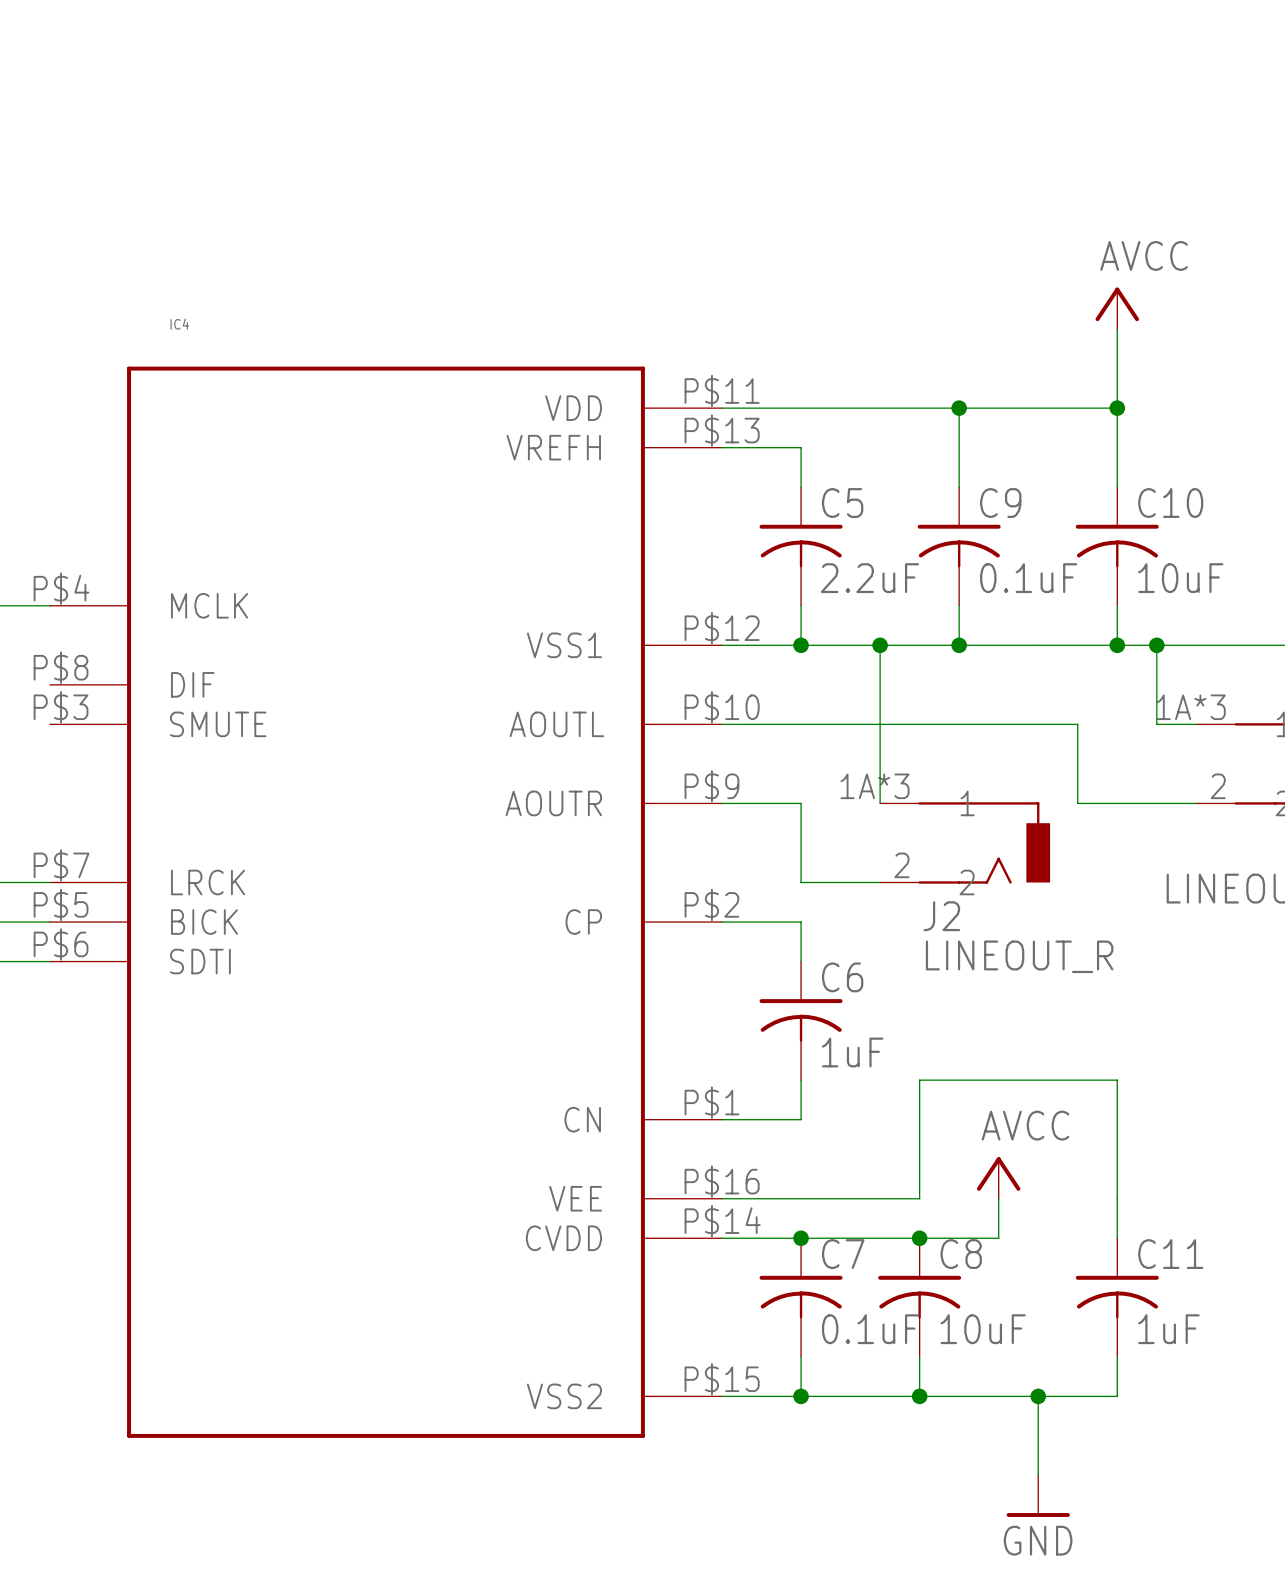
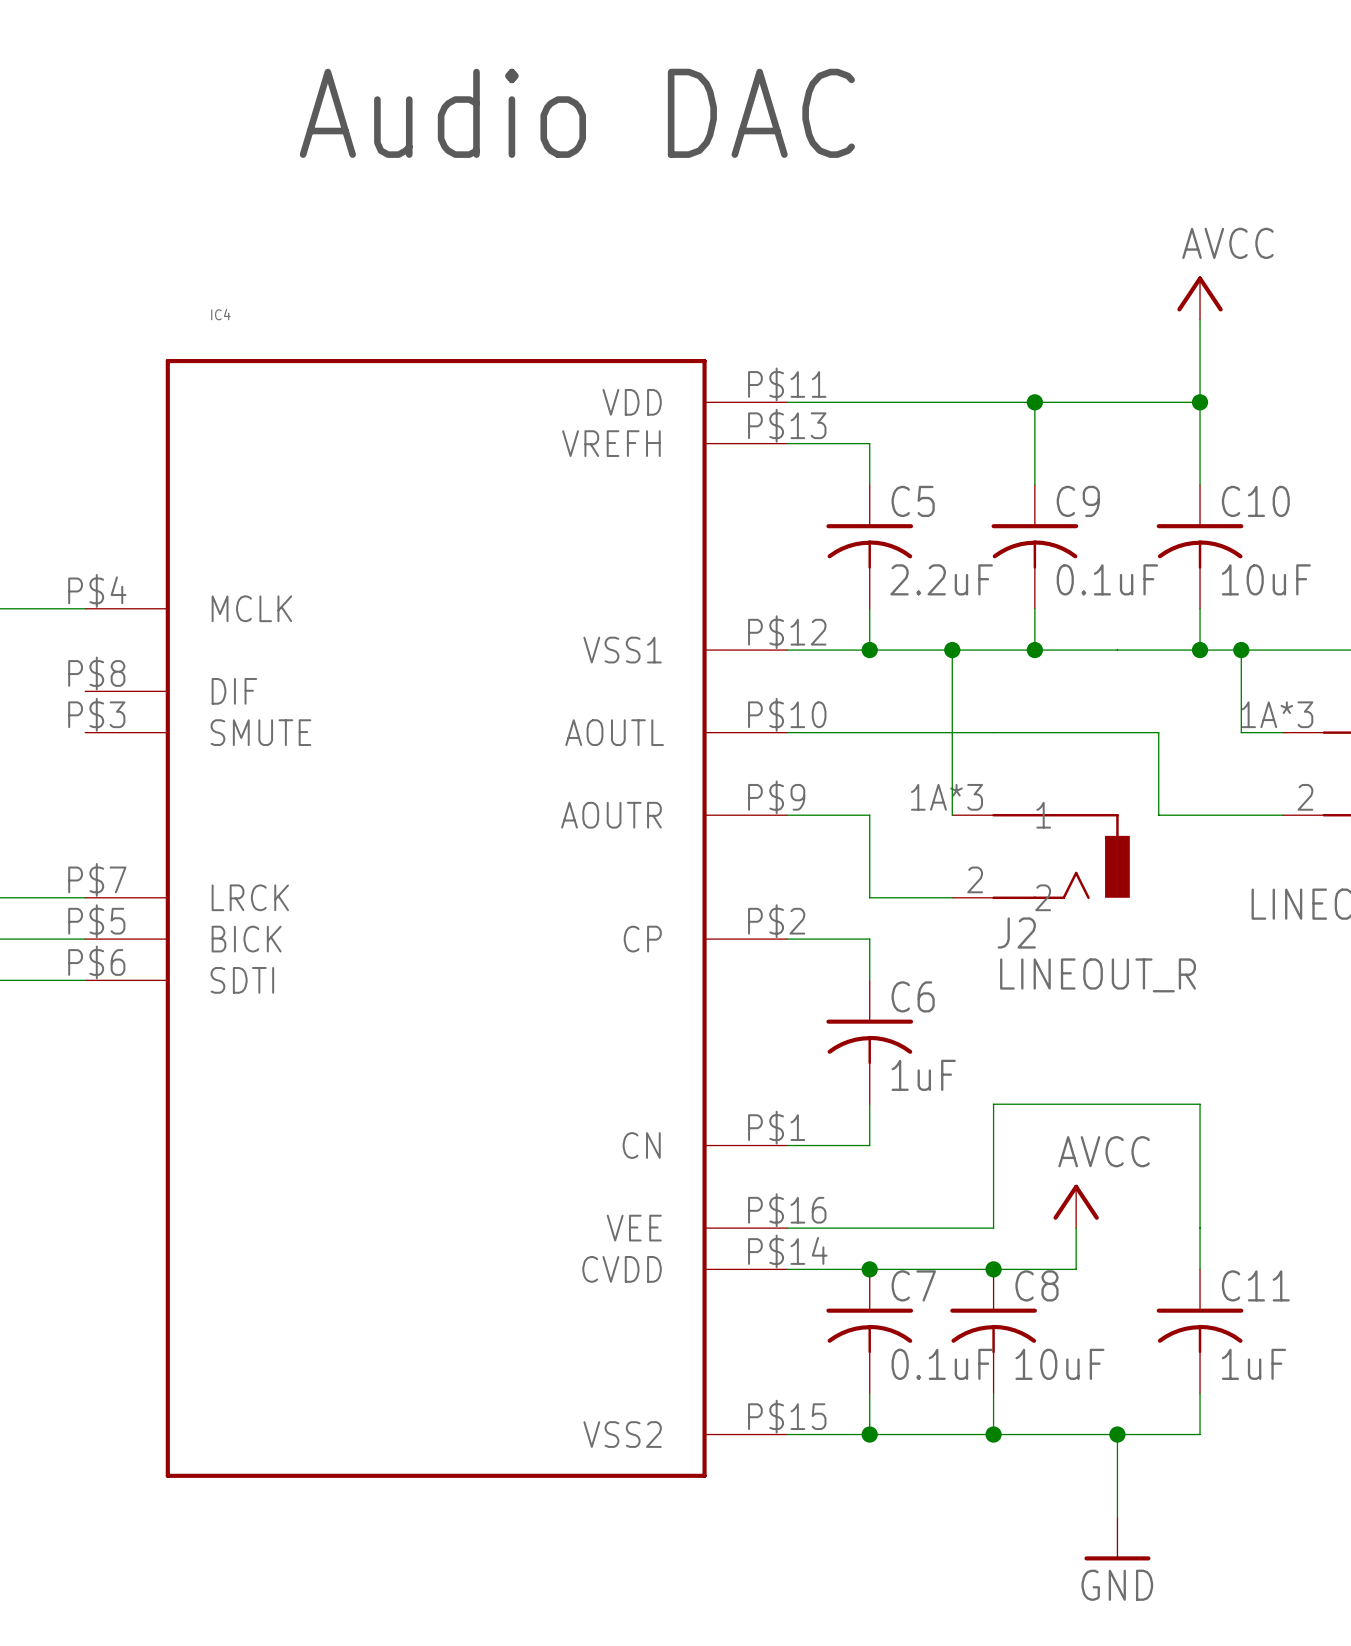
text: none -> Audio DAC (577, 113)

